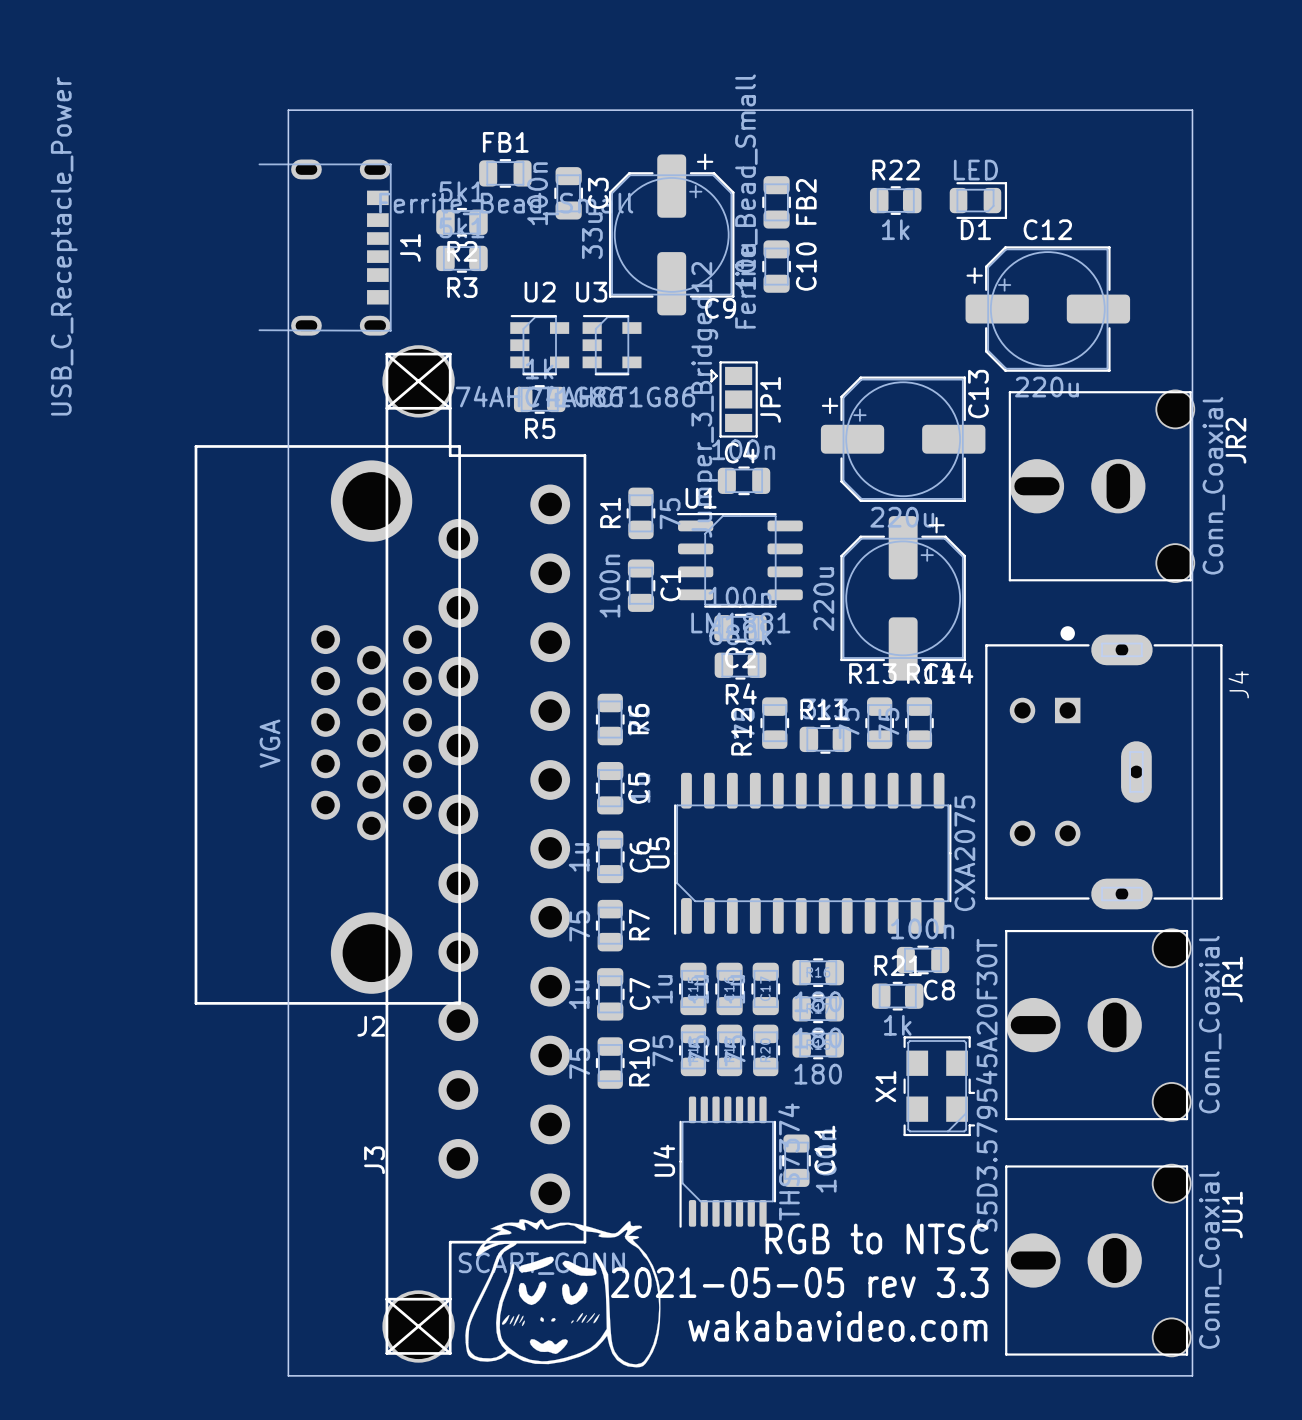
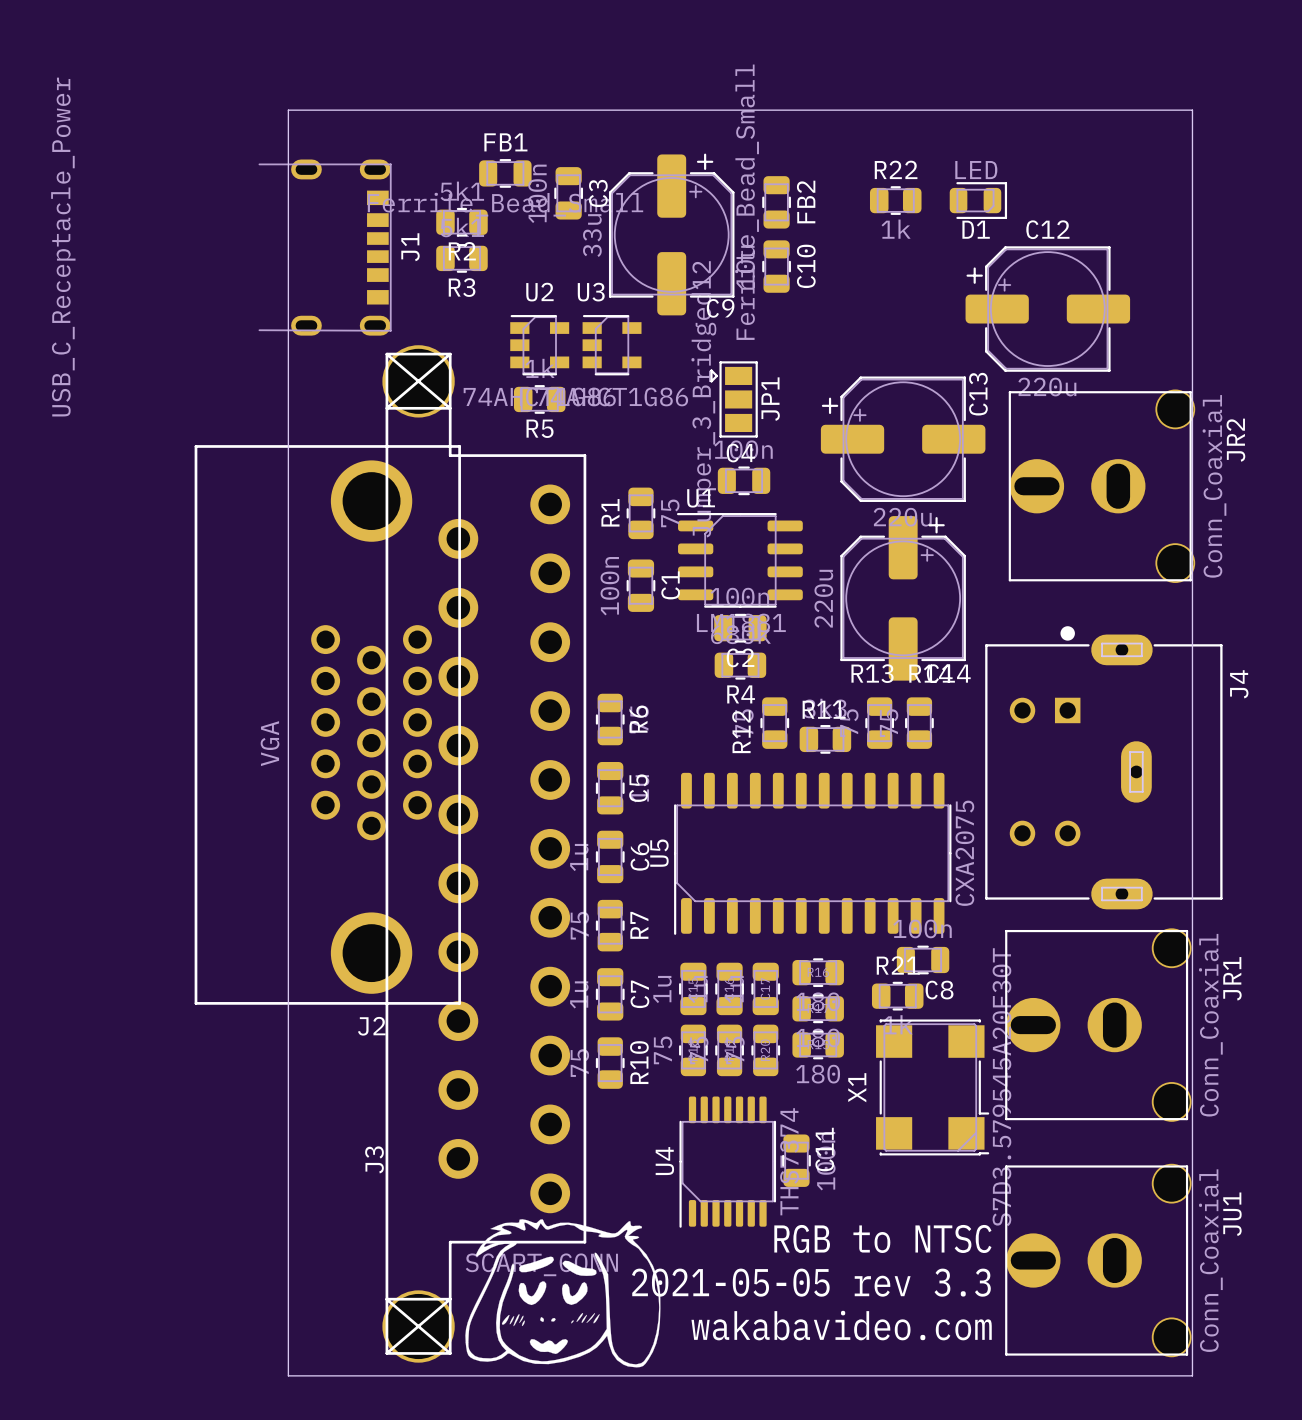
X1 footprint: [903, 1036, 976, 1137] -> [876, 1019, 990, 1156]
X1 value: S5D3.579545A20F30T (986, 1085) -> S7D3.579545A20F30T (1001, 1087)

